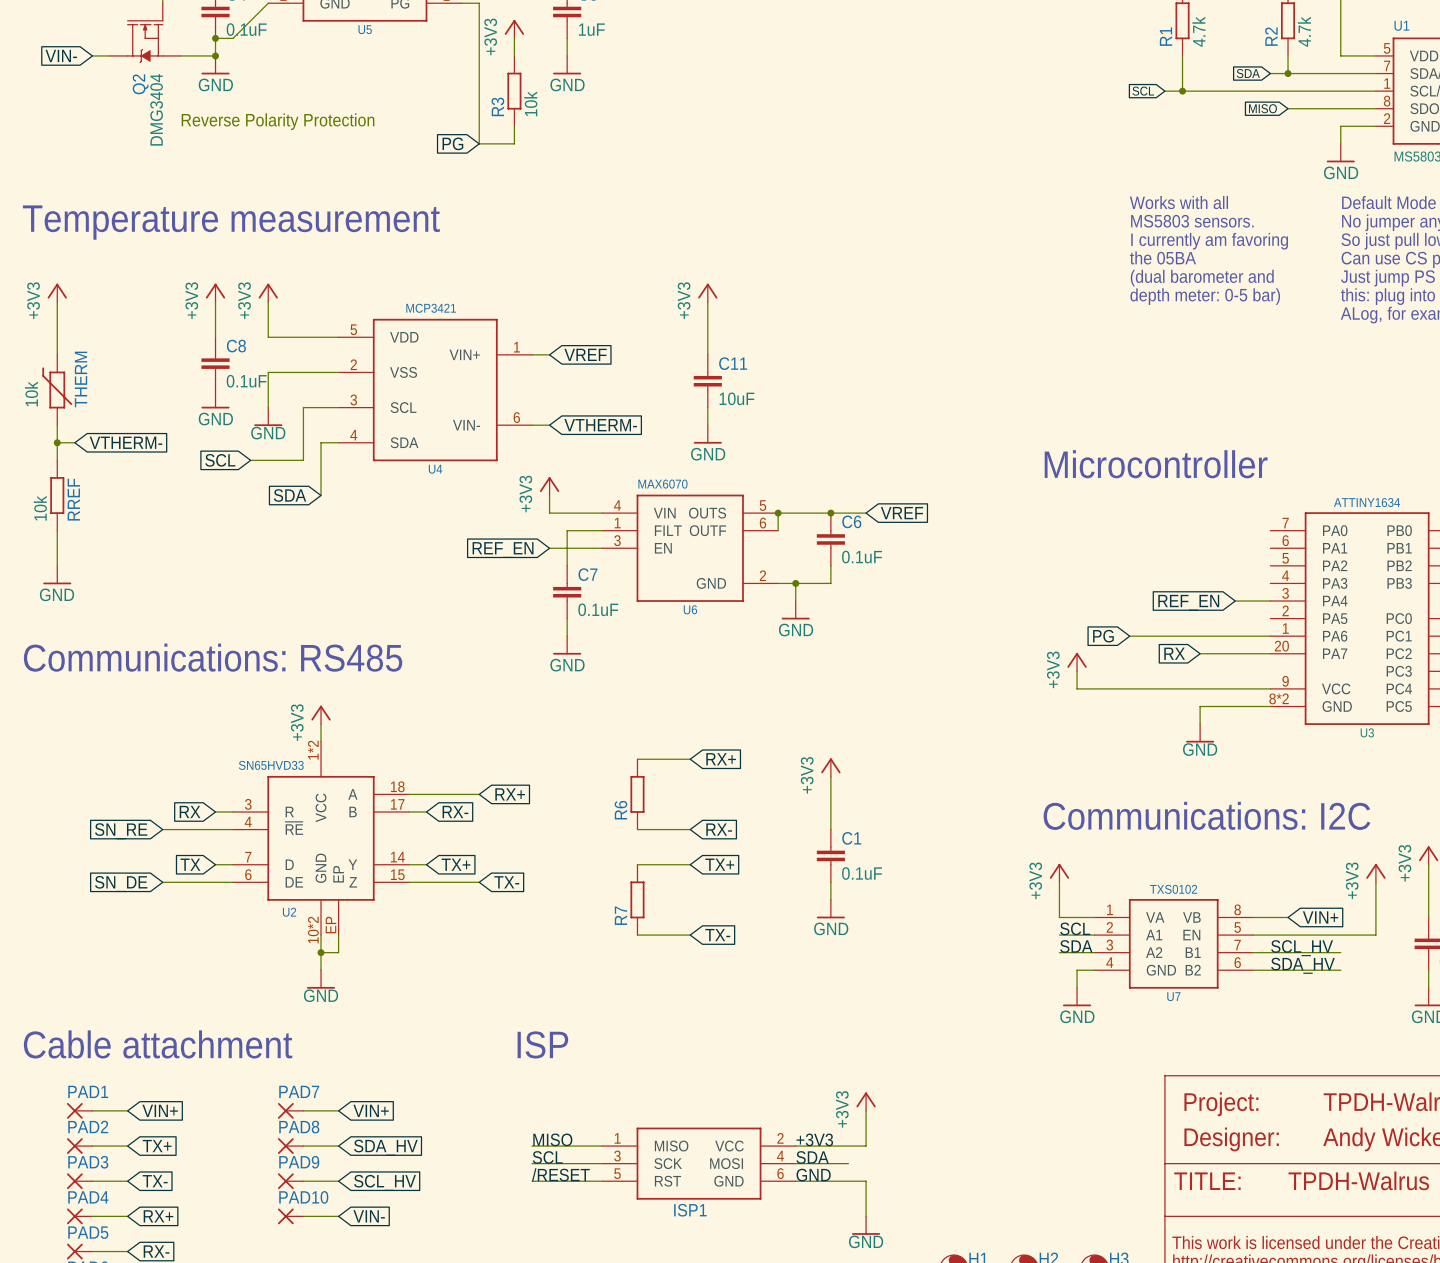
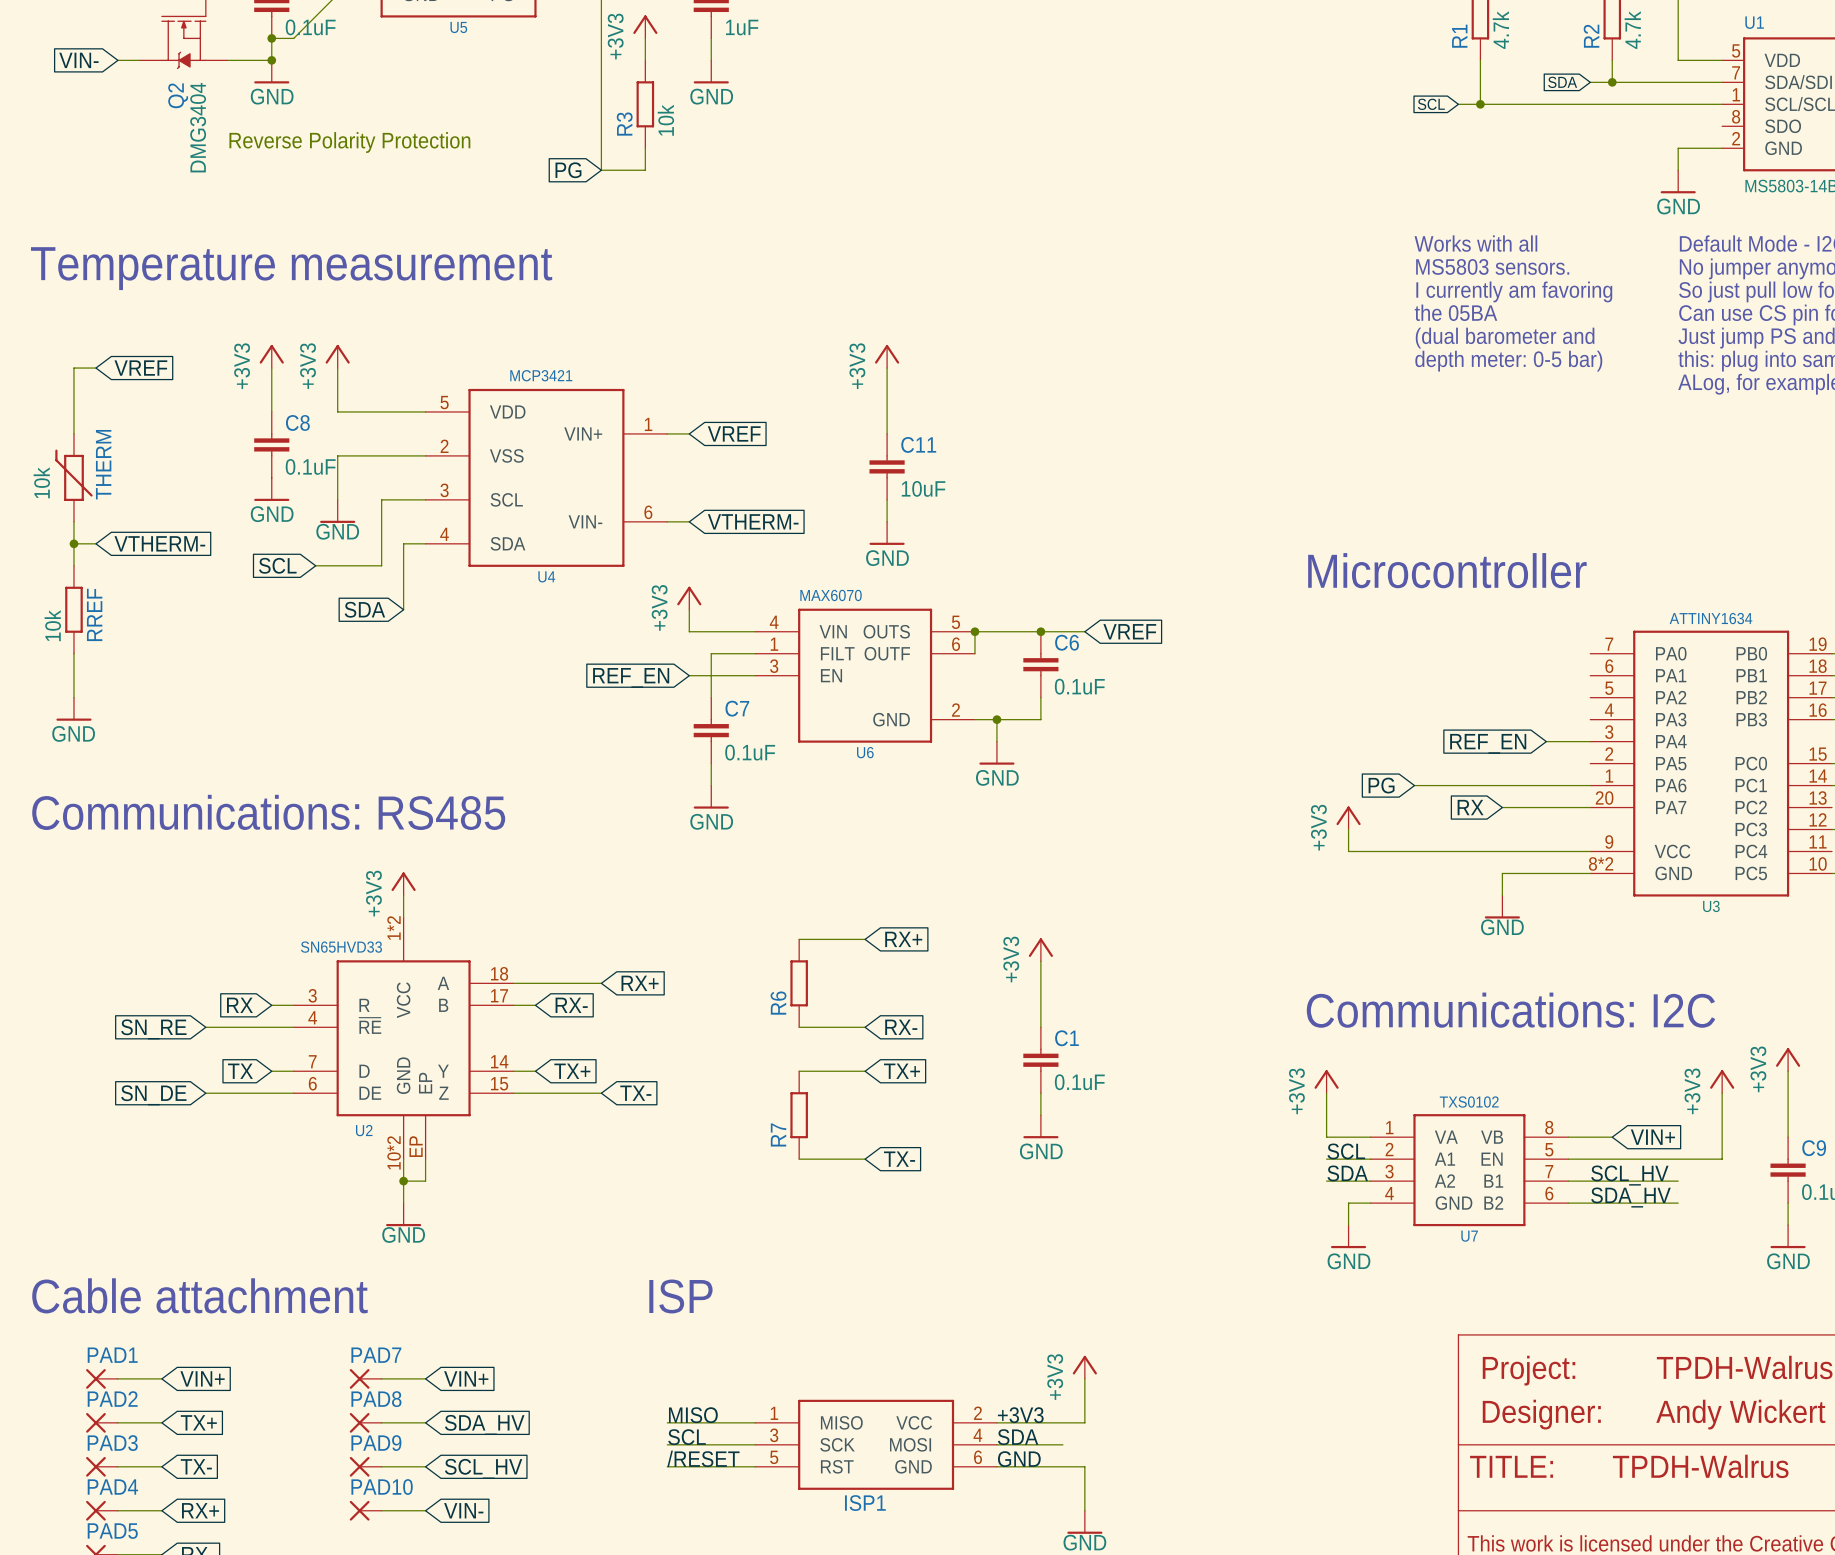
global label: MISO (1262, 108) -> none
wire: (1288, 108) (1375, 108) -> none
power symbol: +3V3 (57, 292) -> none
wire: none -> (73, 368) (95, 368)
global label: none -> VREF (140, 368)

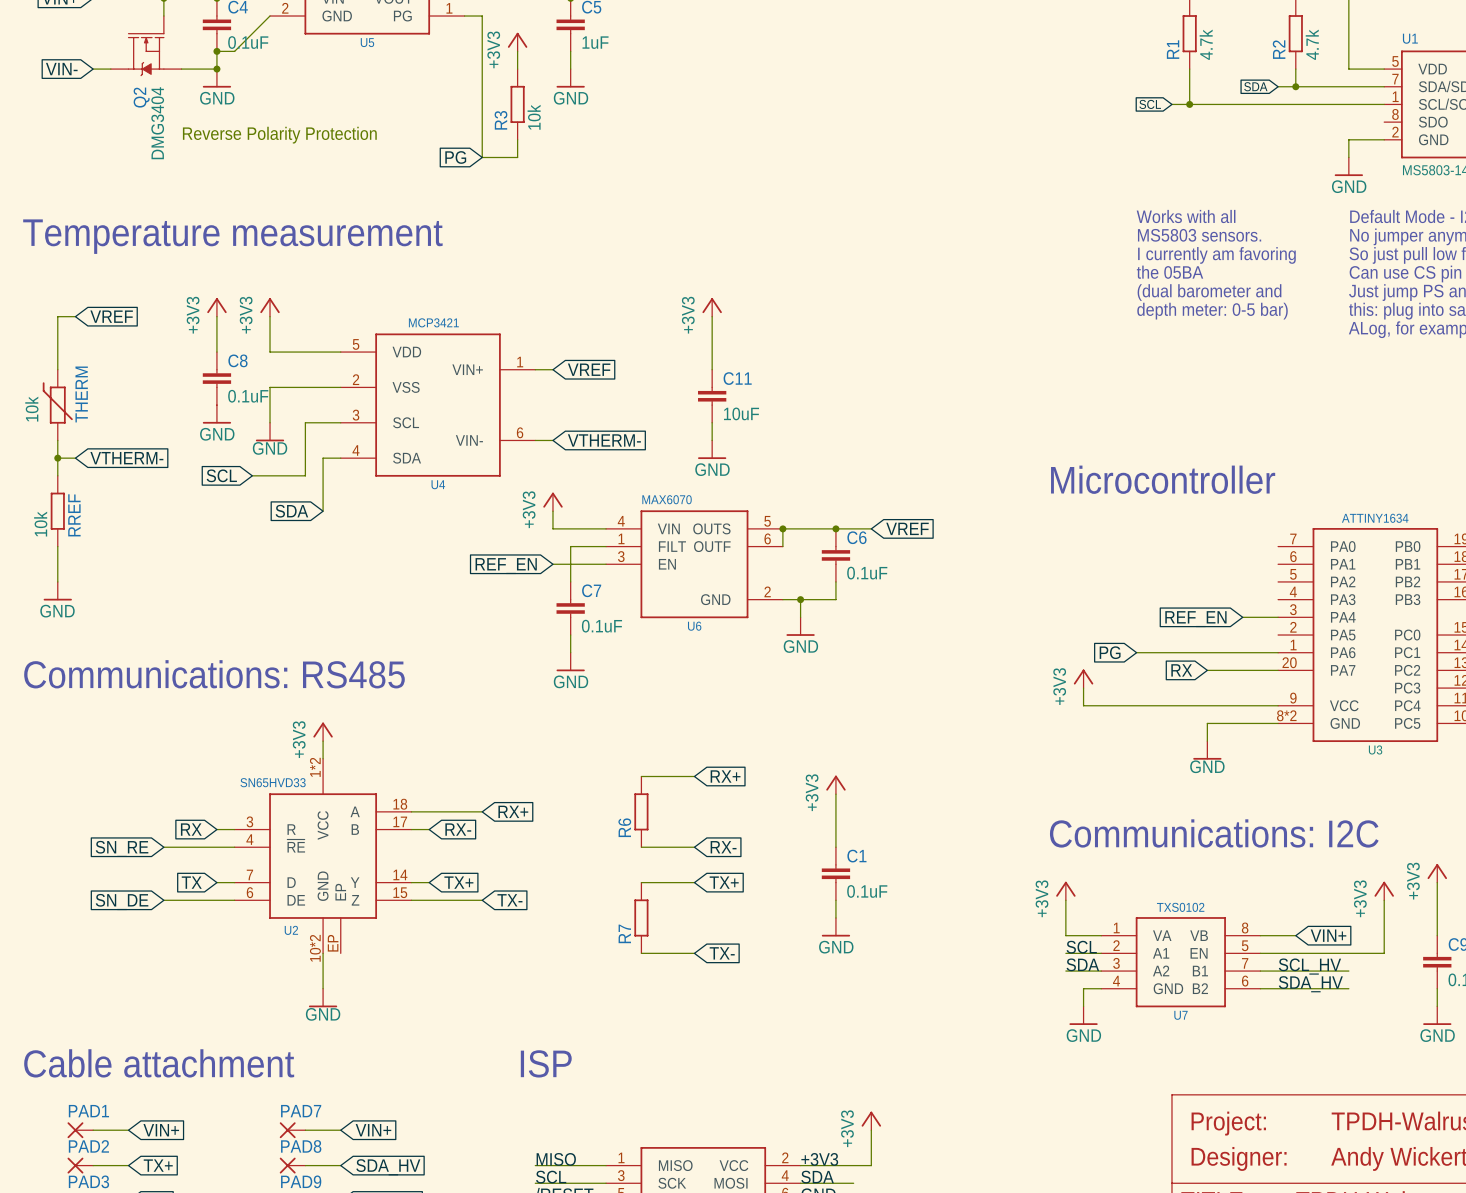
wire: (425, 1159) (425, 1181) (403, 1181) -> none
junction: (403, 1181) -> none

